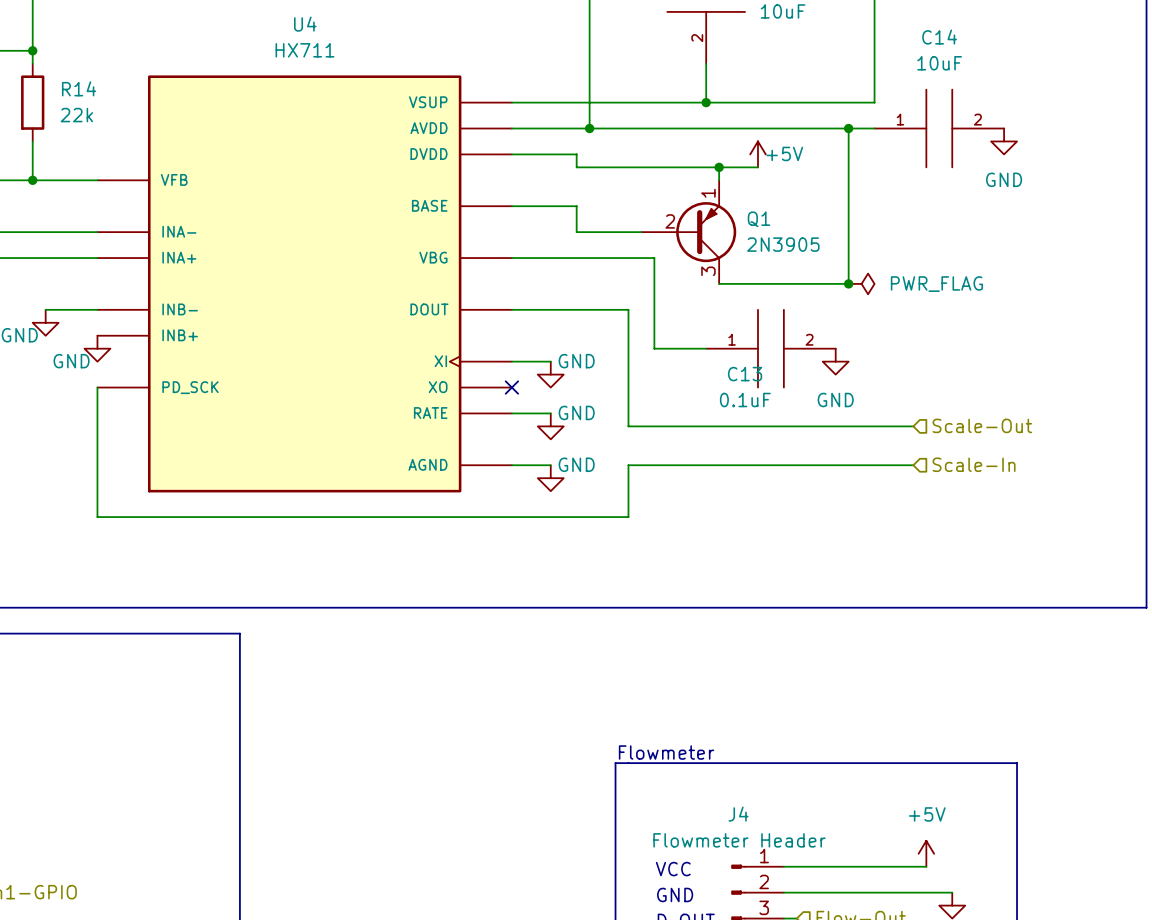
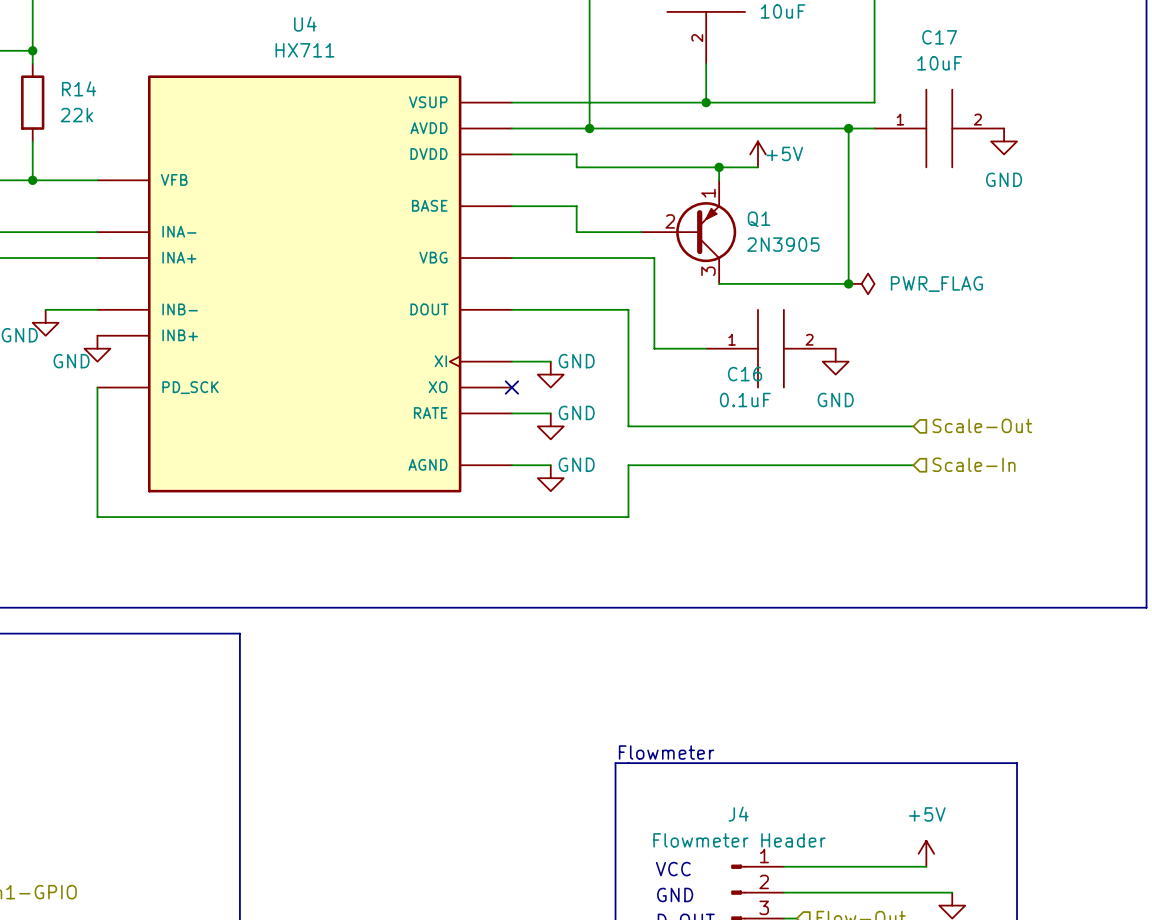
C14 name: C14 (939, 37) -> C17 (939, 37)
C13 name: C13 (745, 374) -> C16 (745, 374)

